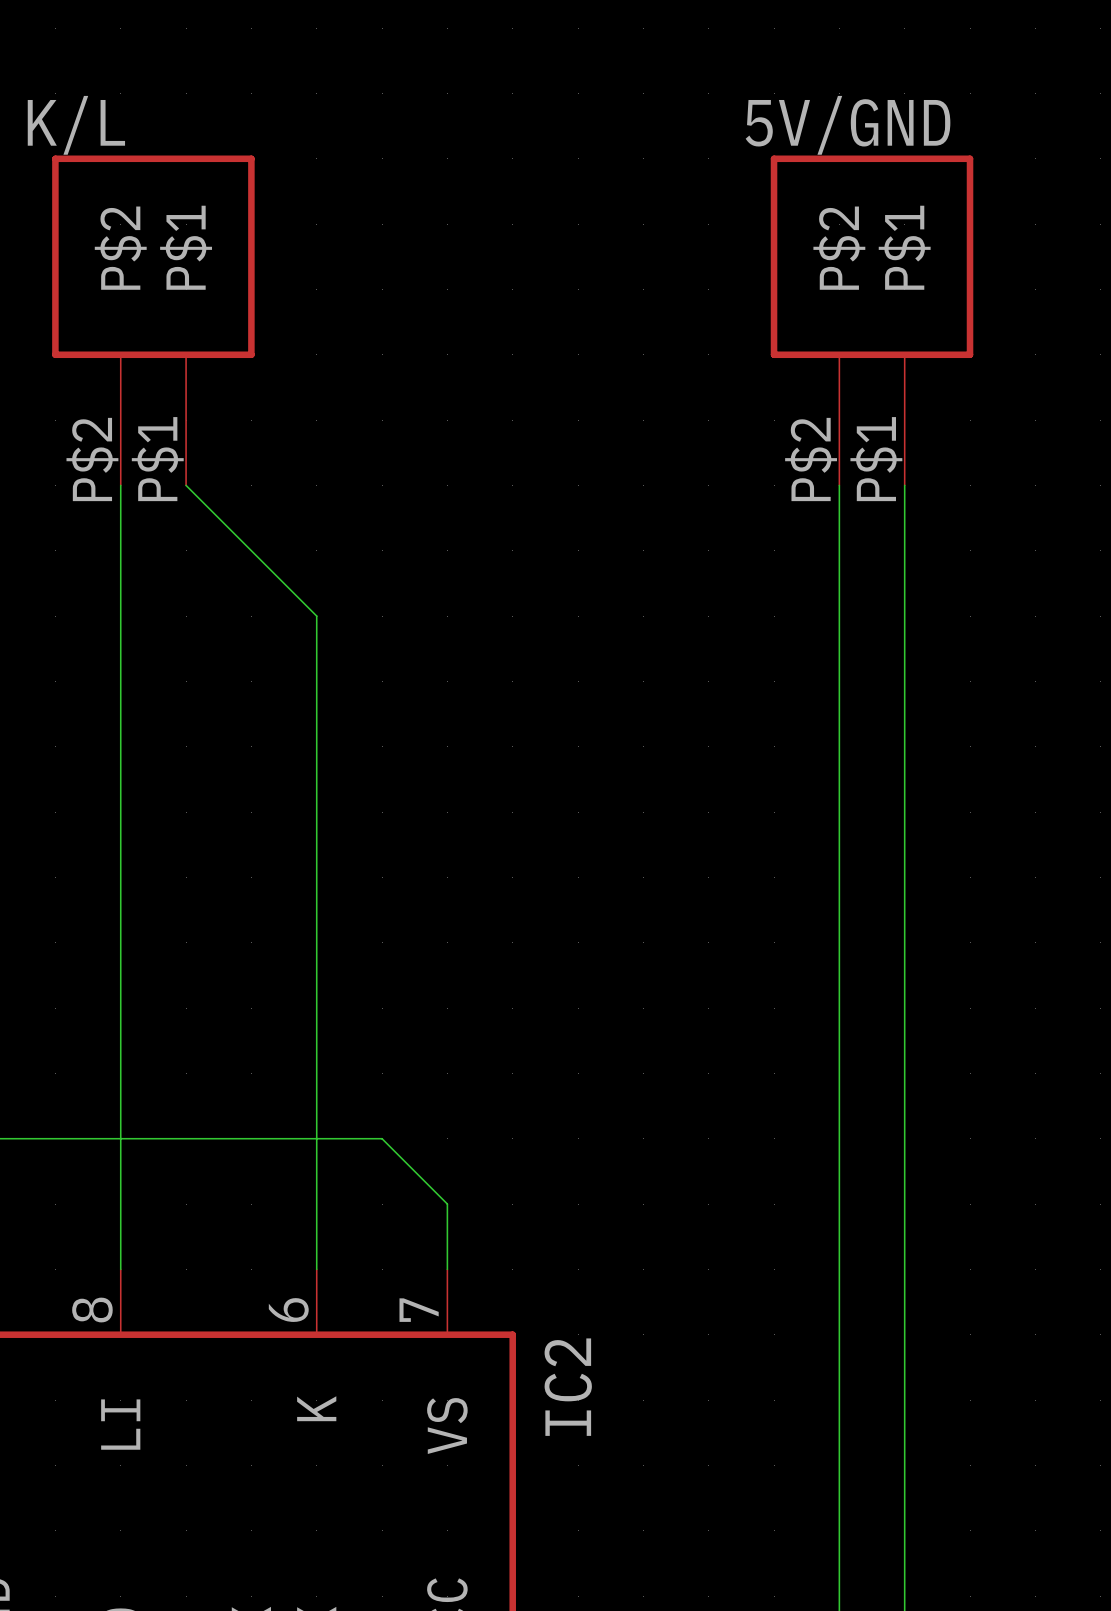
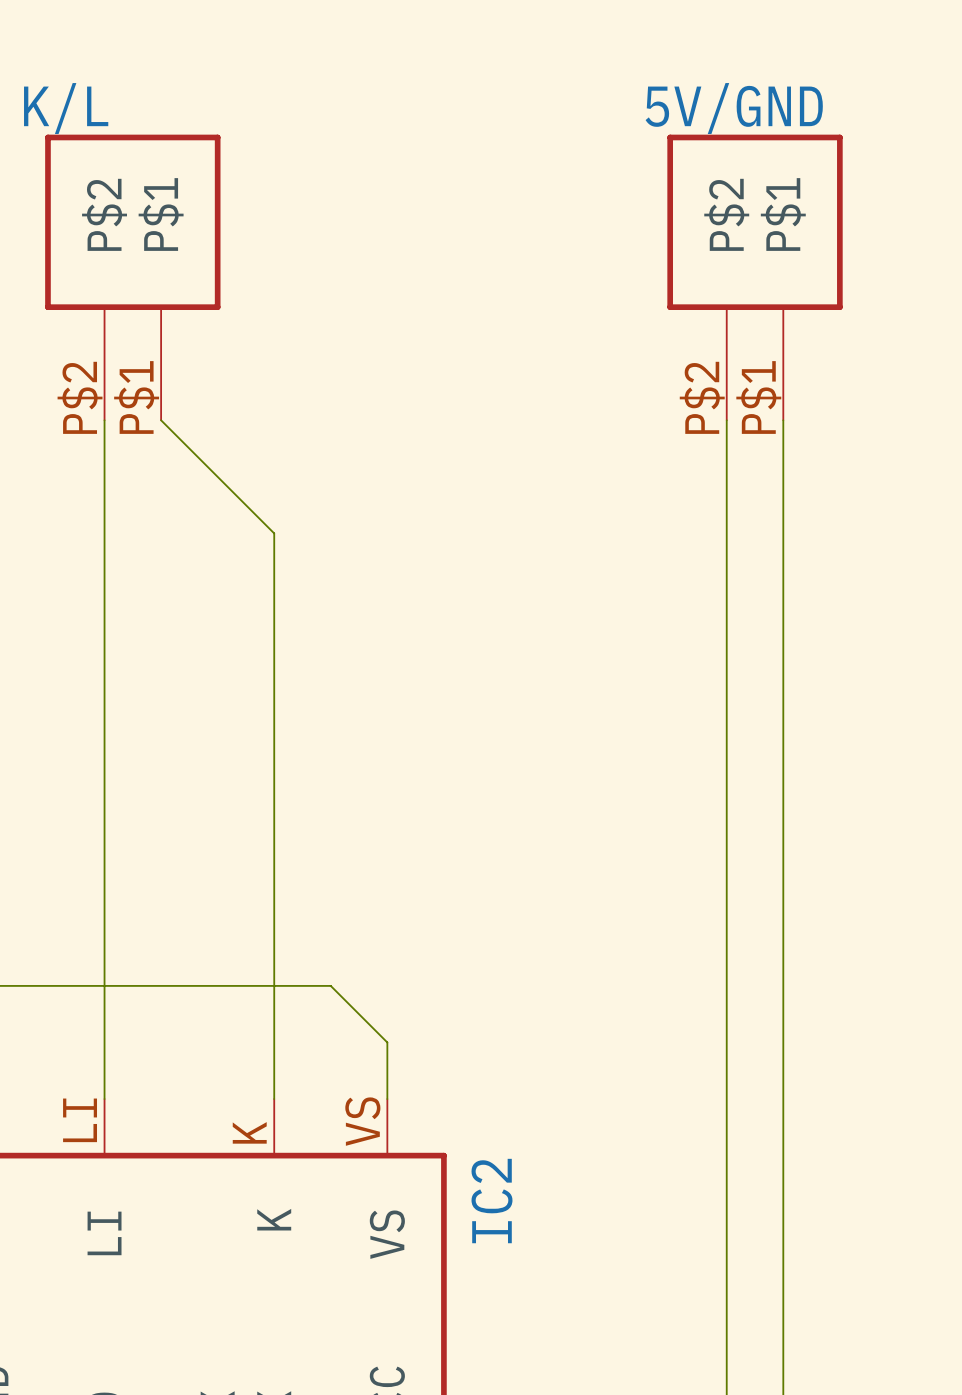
IC2 pin number: 8 (92, 1310) -> LI (80, 1120)
IC2 pin number: 6 (288, 1310) -> K (249, 1132)
IC2 pin number: 7 (419, 1310) -> VS (362, 1121)

